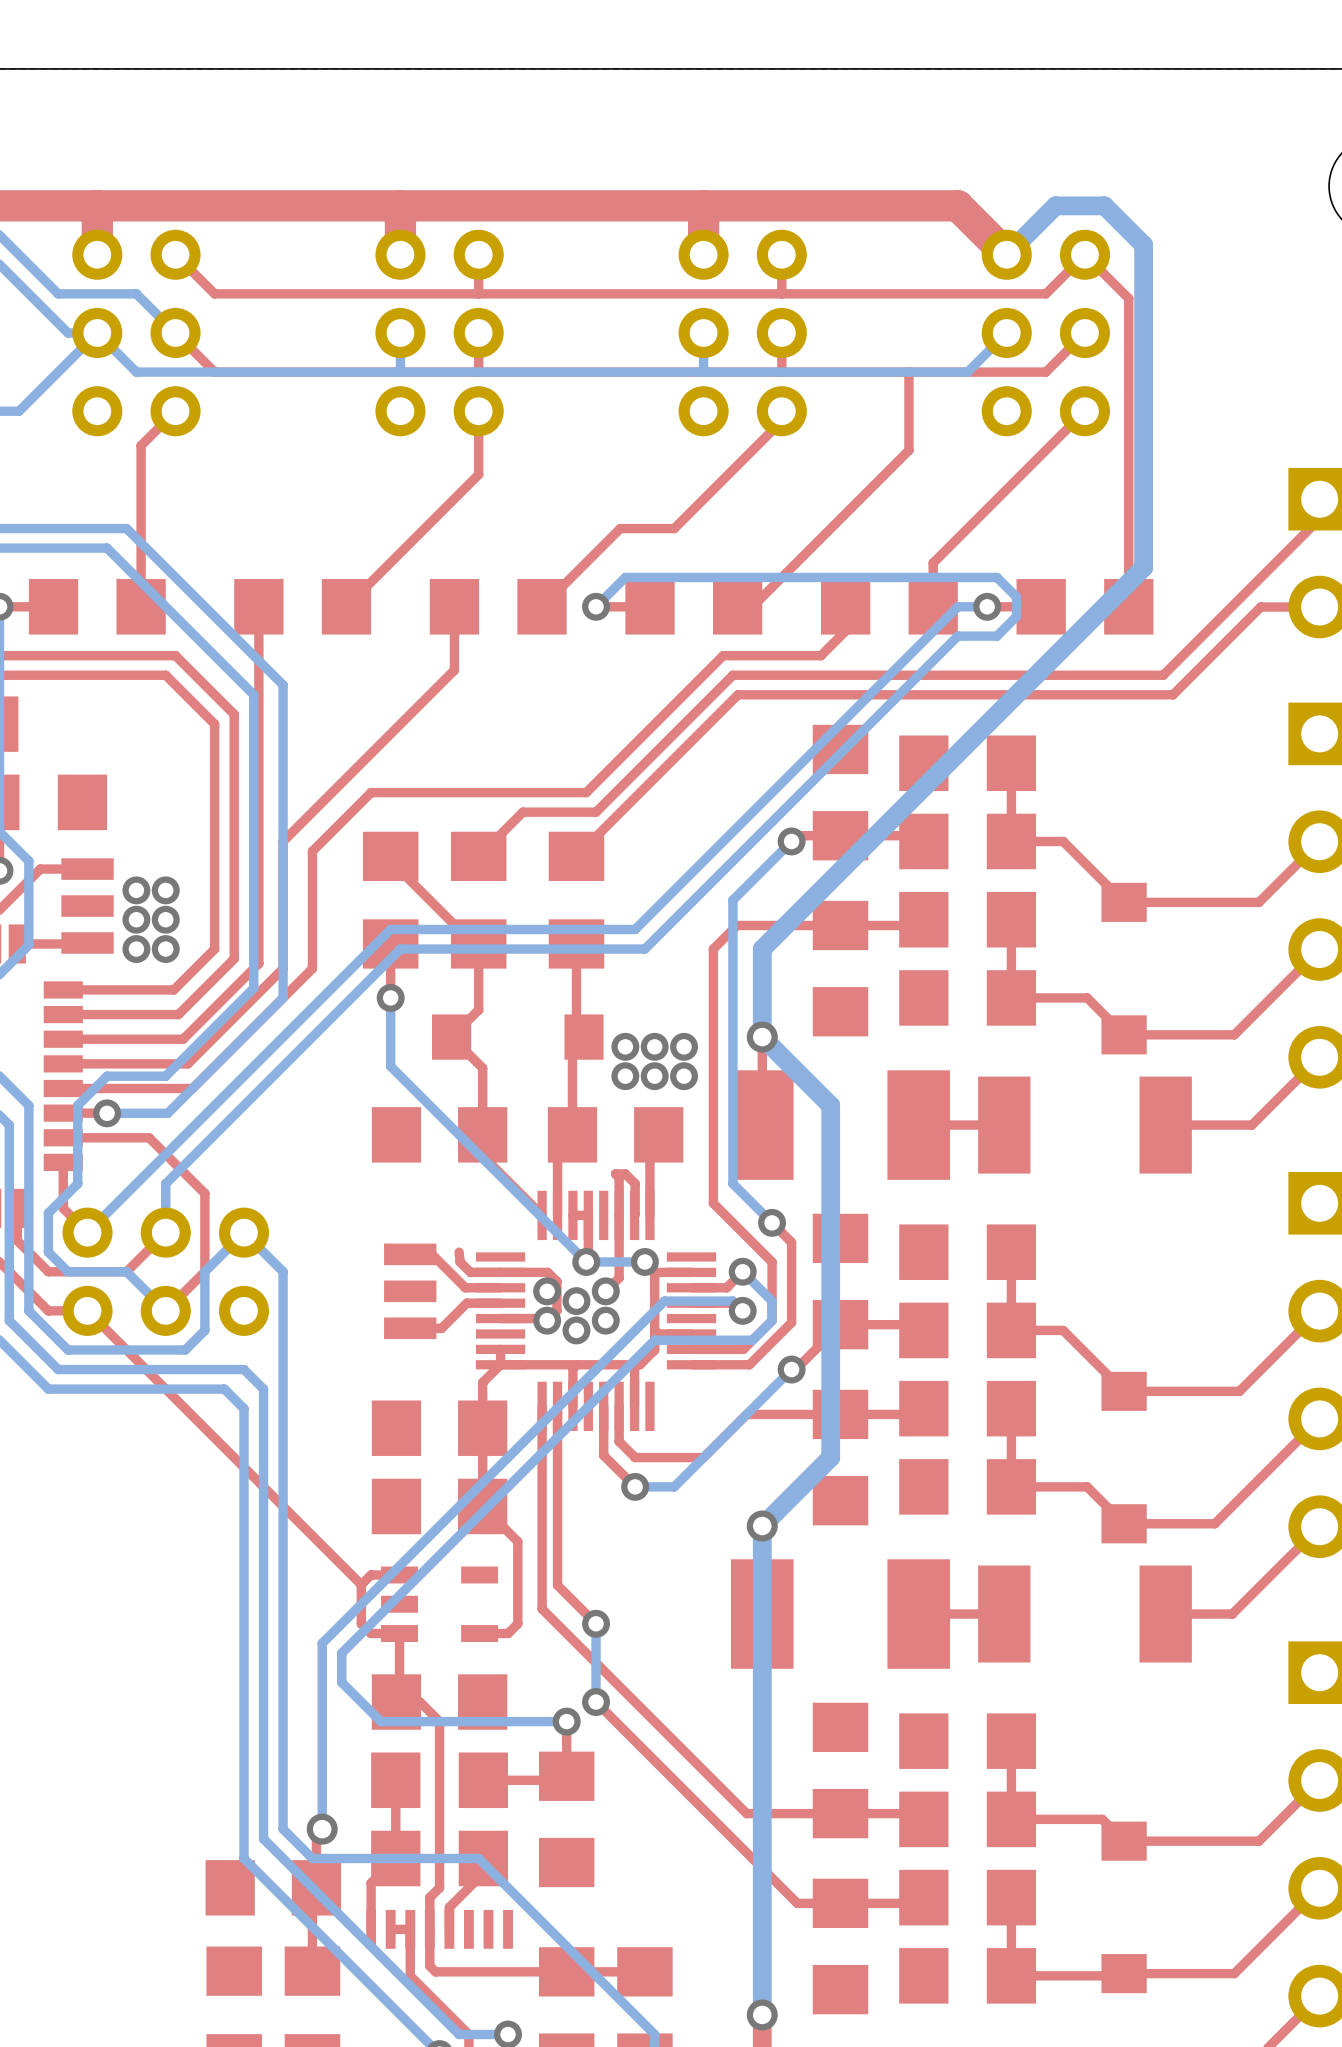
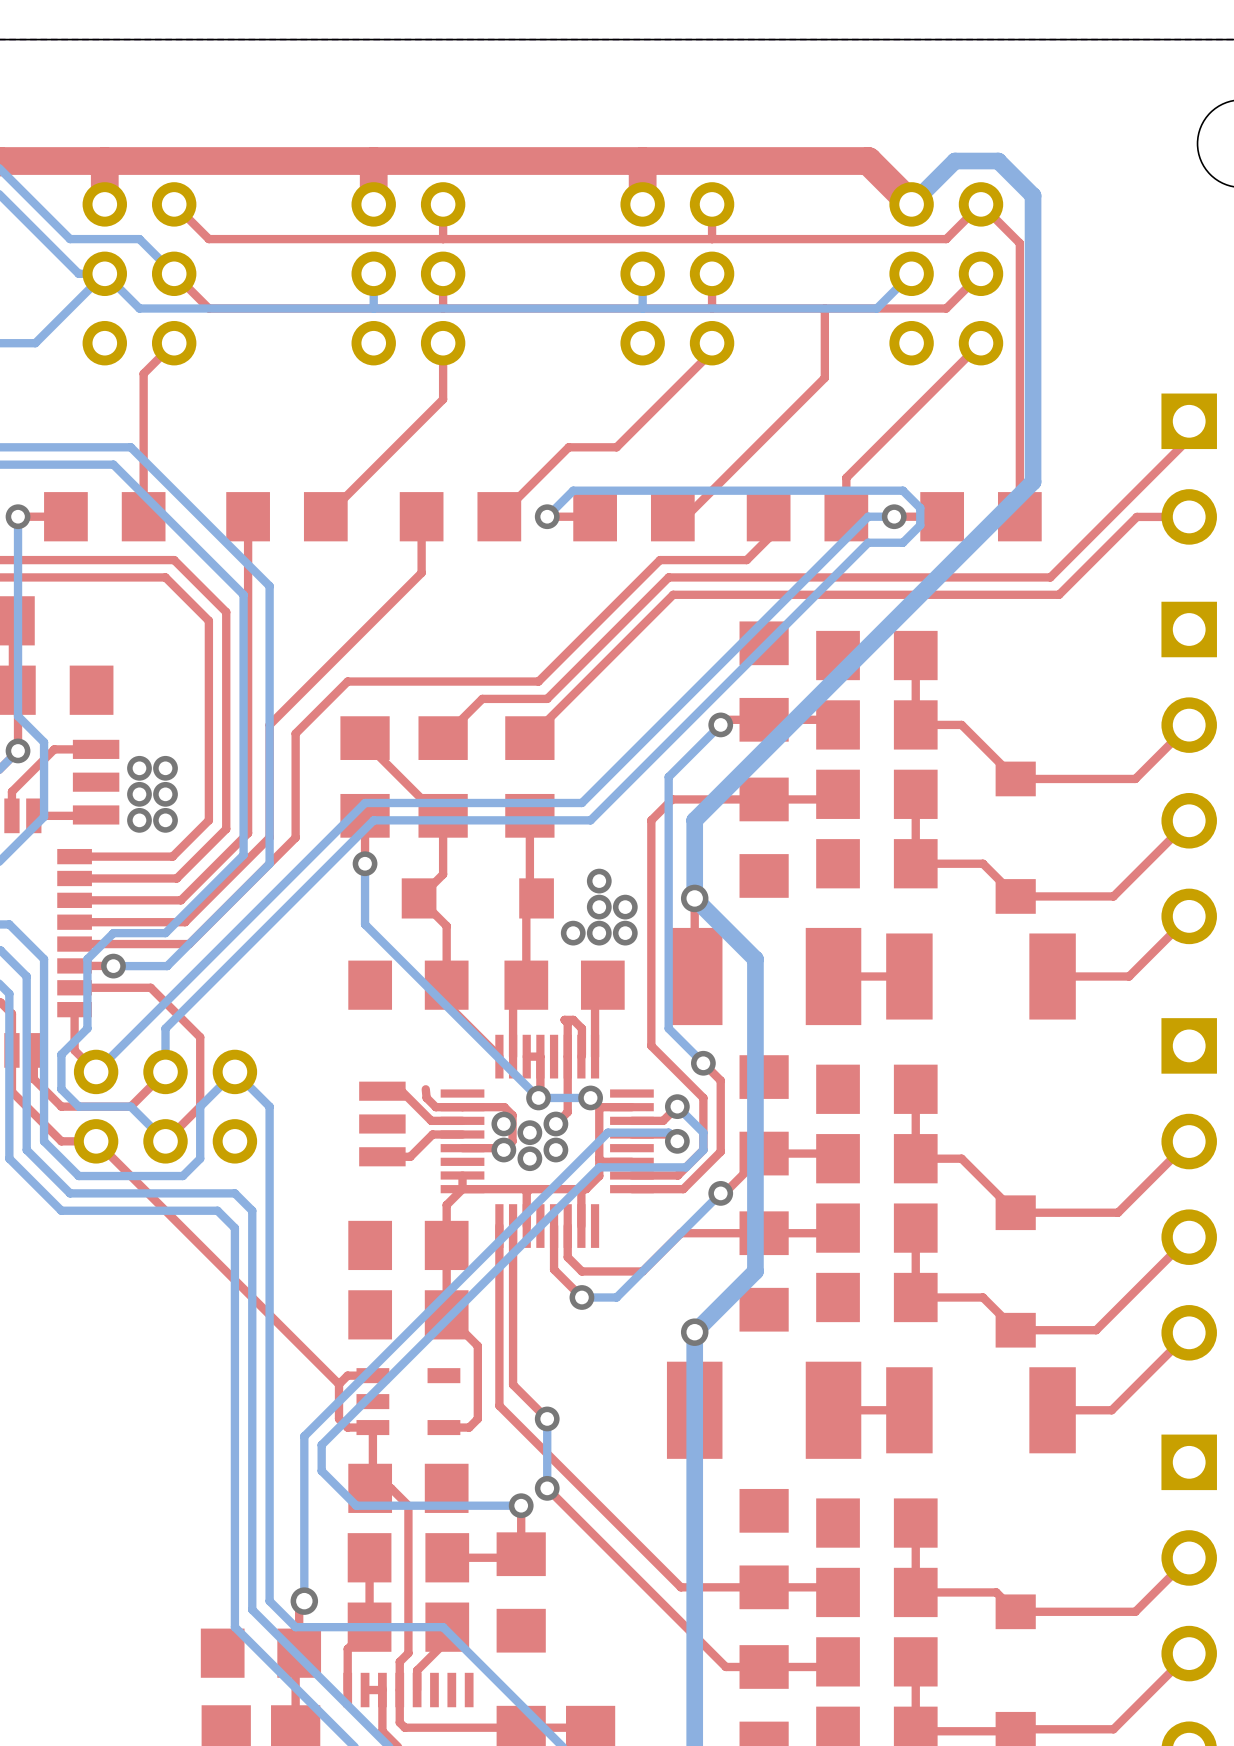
via position: (625, 1046) -> (599, 881)

